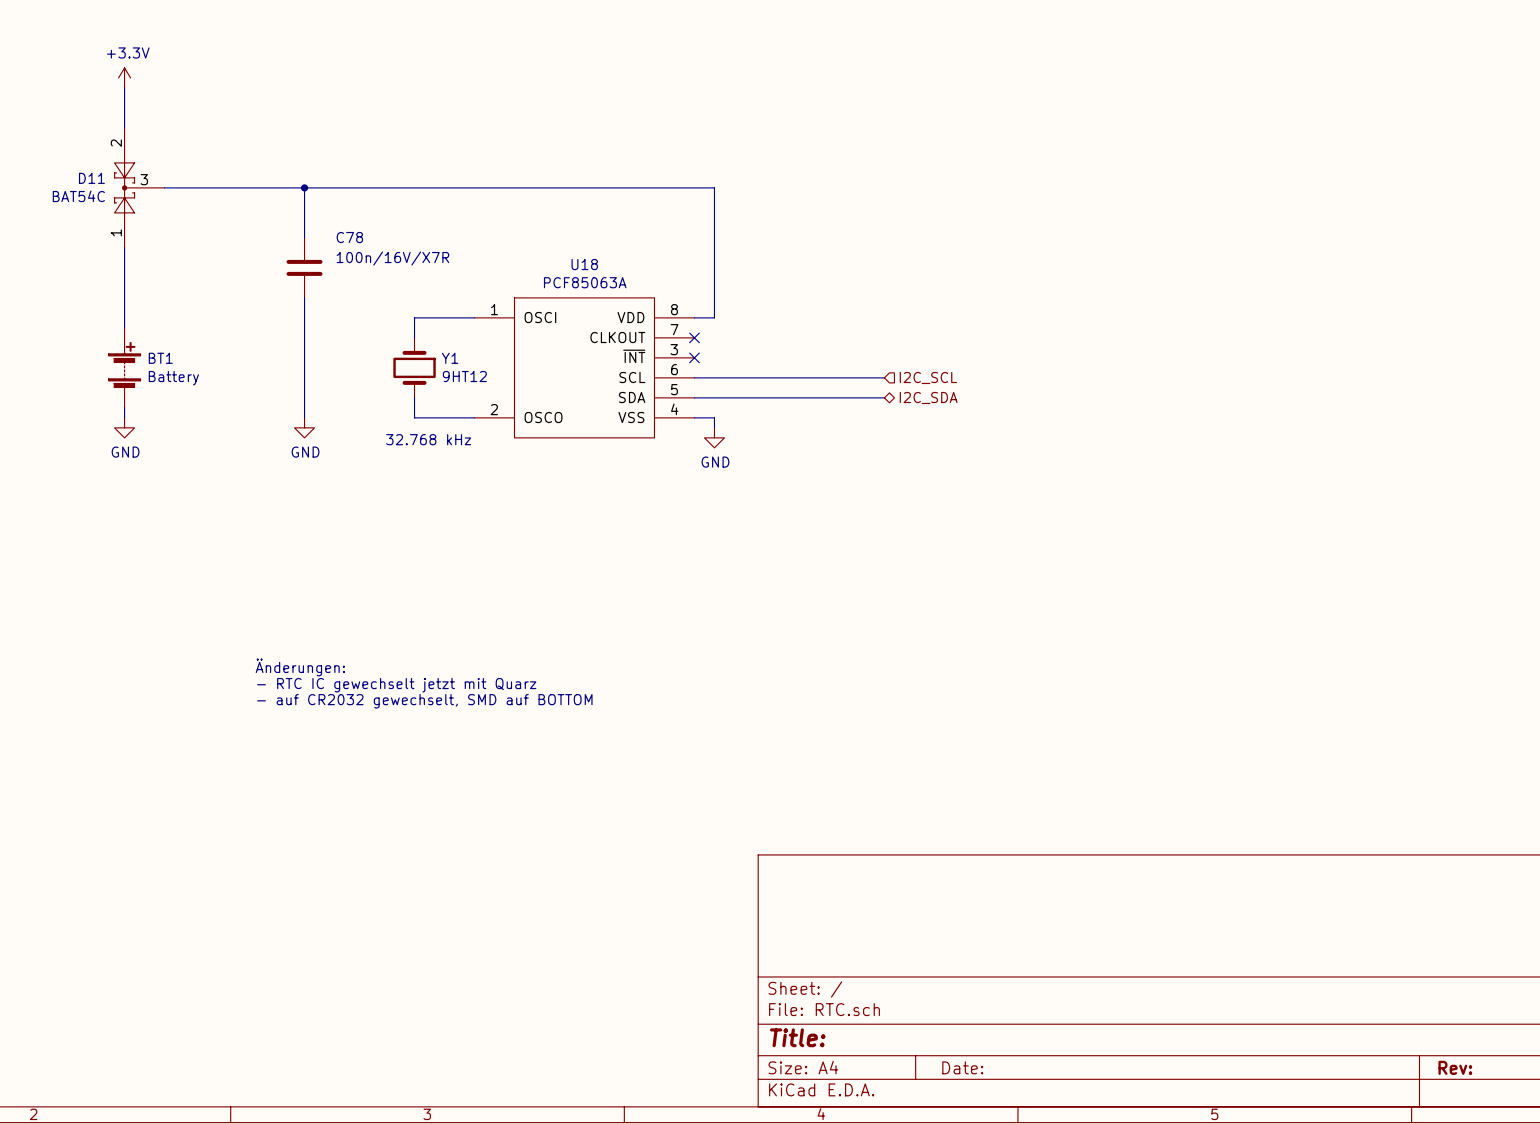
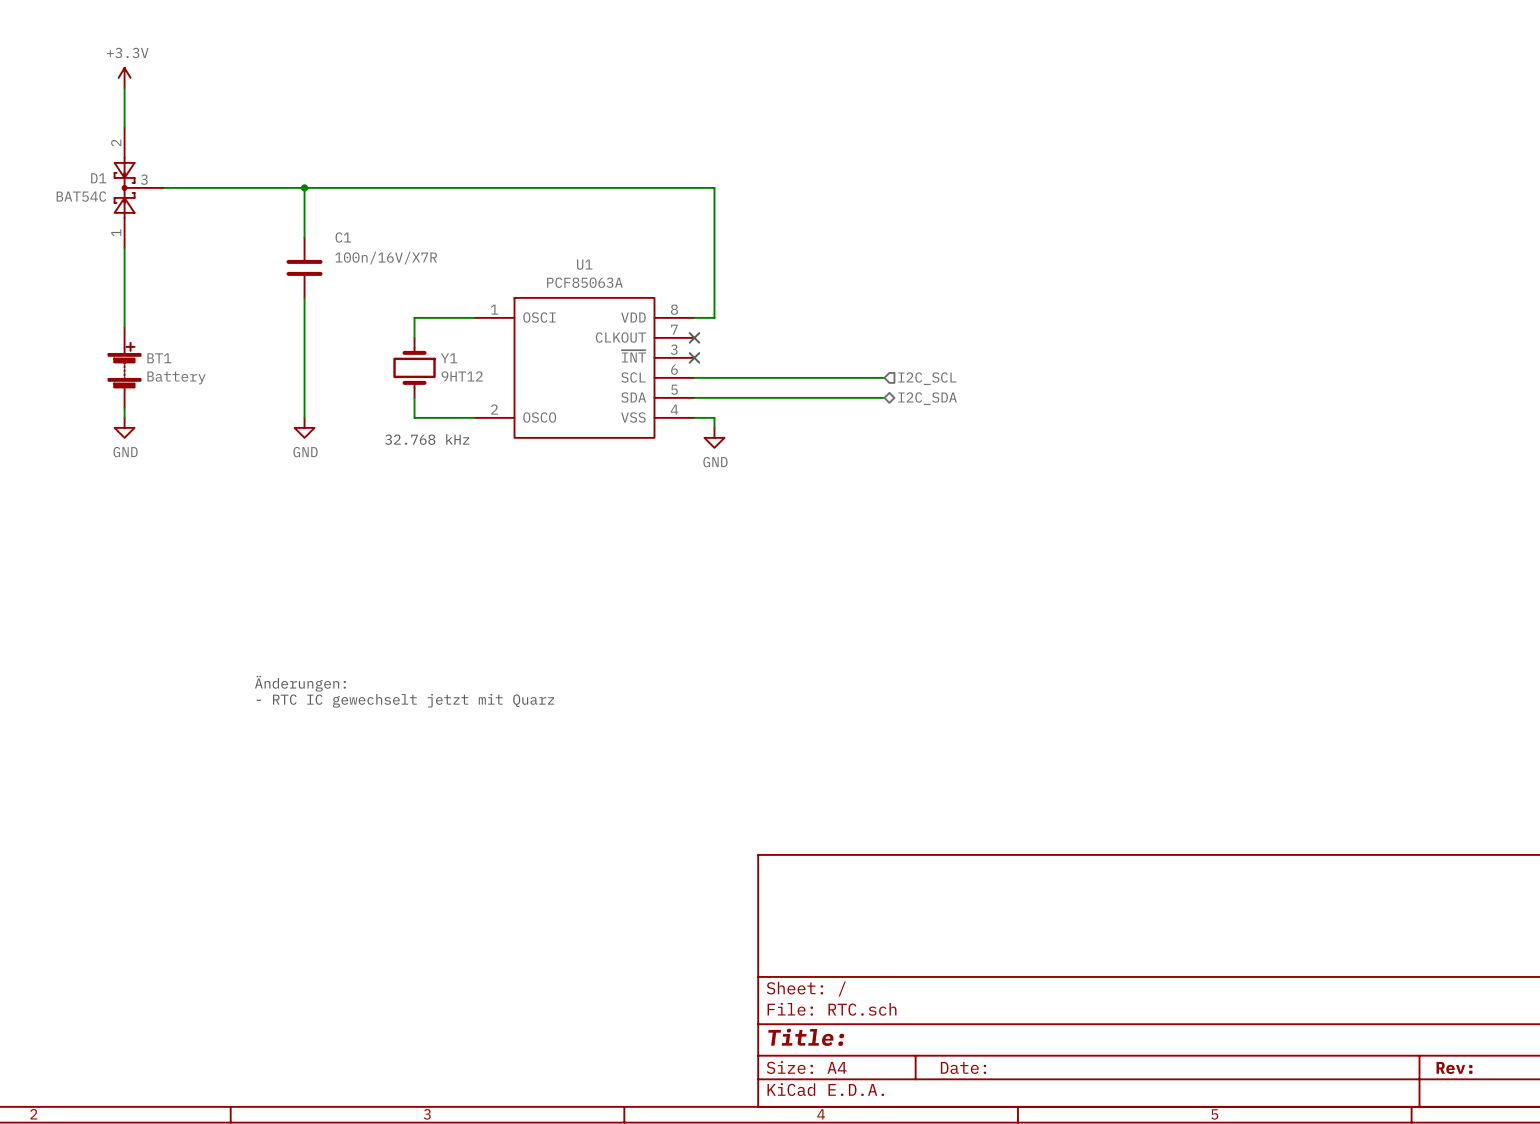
D11 name: D11 (91, 178) -> D1 (98, 178)
C78 name: C78 (349, 237) -> C1 (343, 237)
U18 name: U18 (584, 264) -> U1 (584, 264)
text: Änderungen: (300, 667) -> none
text: - RTC IC gewechselt jetzt mit Quarz (396, 685) -> Änderungen: (300, 683)
text: - auf CR2032 gewechselt, SMD auf BOTTOM (424, 701) -> - RTC IC gewechselt jetzt mit Quarz (405, 700)

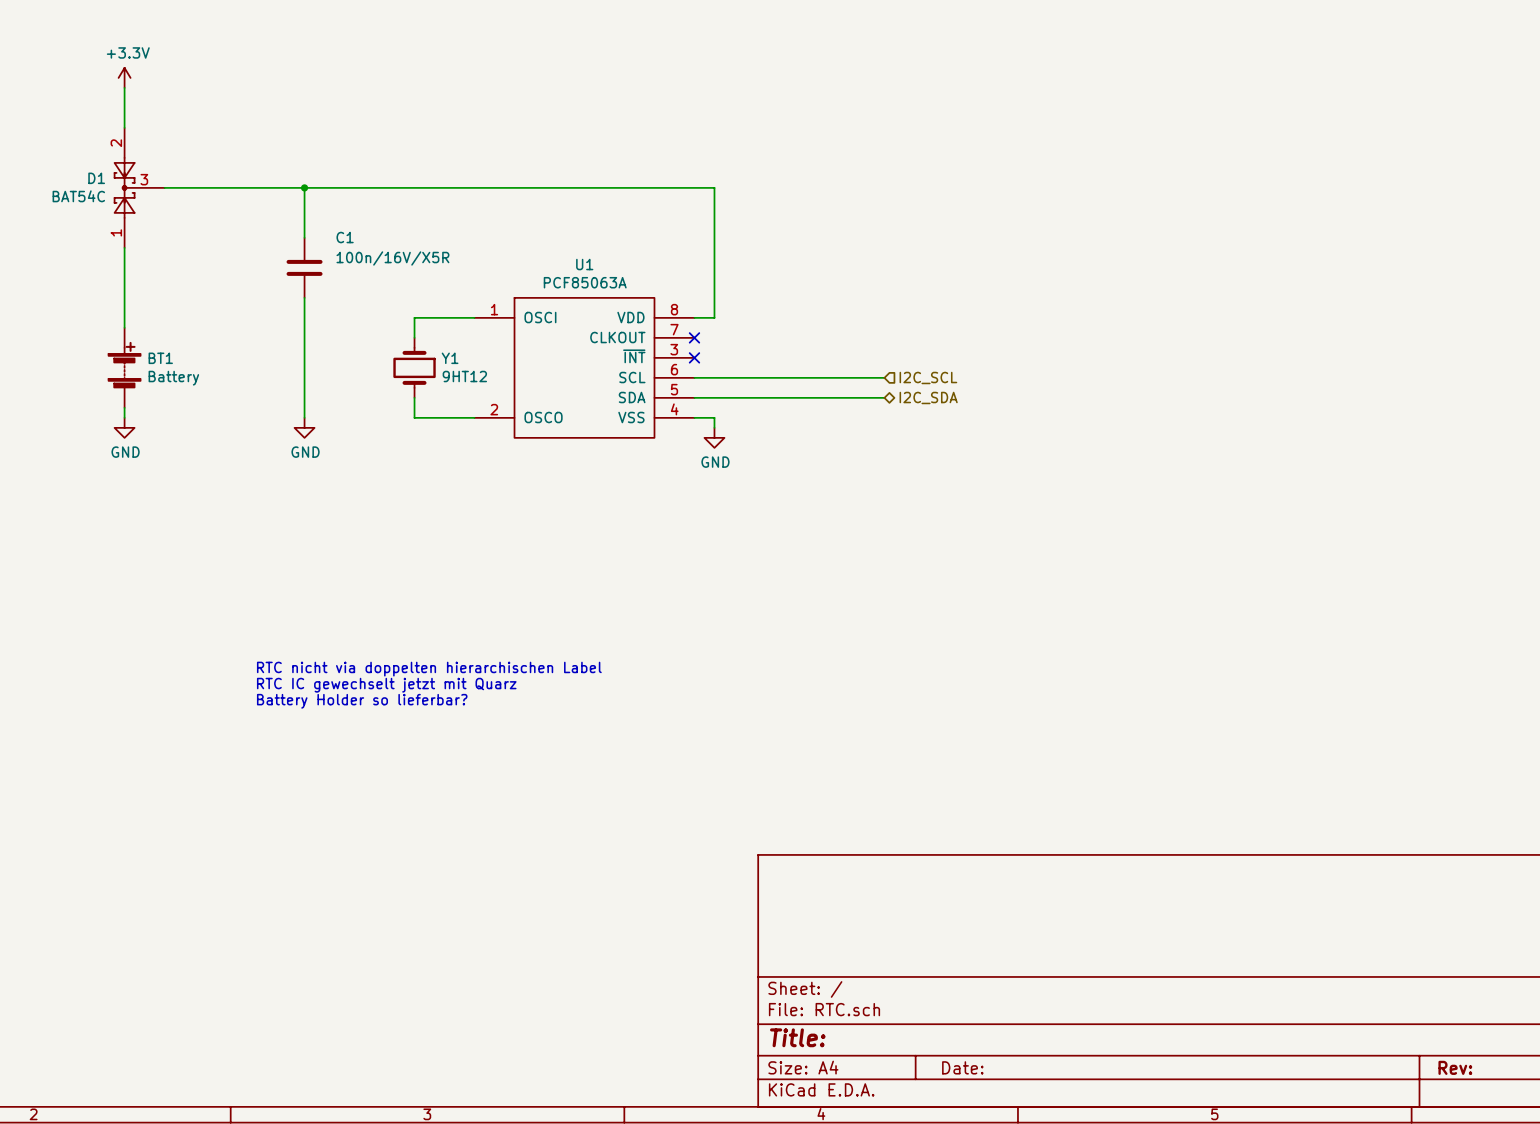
C1 value: 100n/16V/X7R (386, 258) -> 100n/16V/X5R (392, 258)
text: 32.768 kHz (427, 439) -> none
text: none -> RTC nicht via doppelten hierarchischen Label (429, 669)
text: Änderungen: (300, 683) -> RTC IC gewechselt jetzt mit Quarz (386, 685)
text: - RTC IC gewechselt jetzt mit Quarz (405, 700) -> Battery Holder so lieferbar? (362, 701)

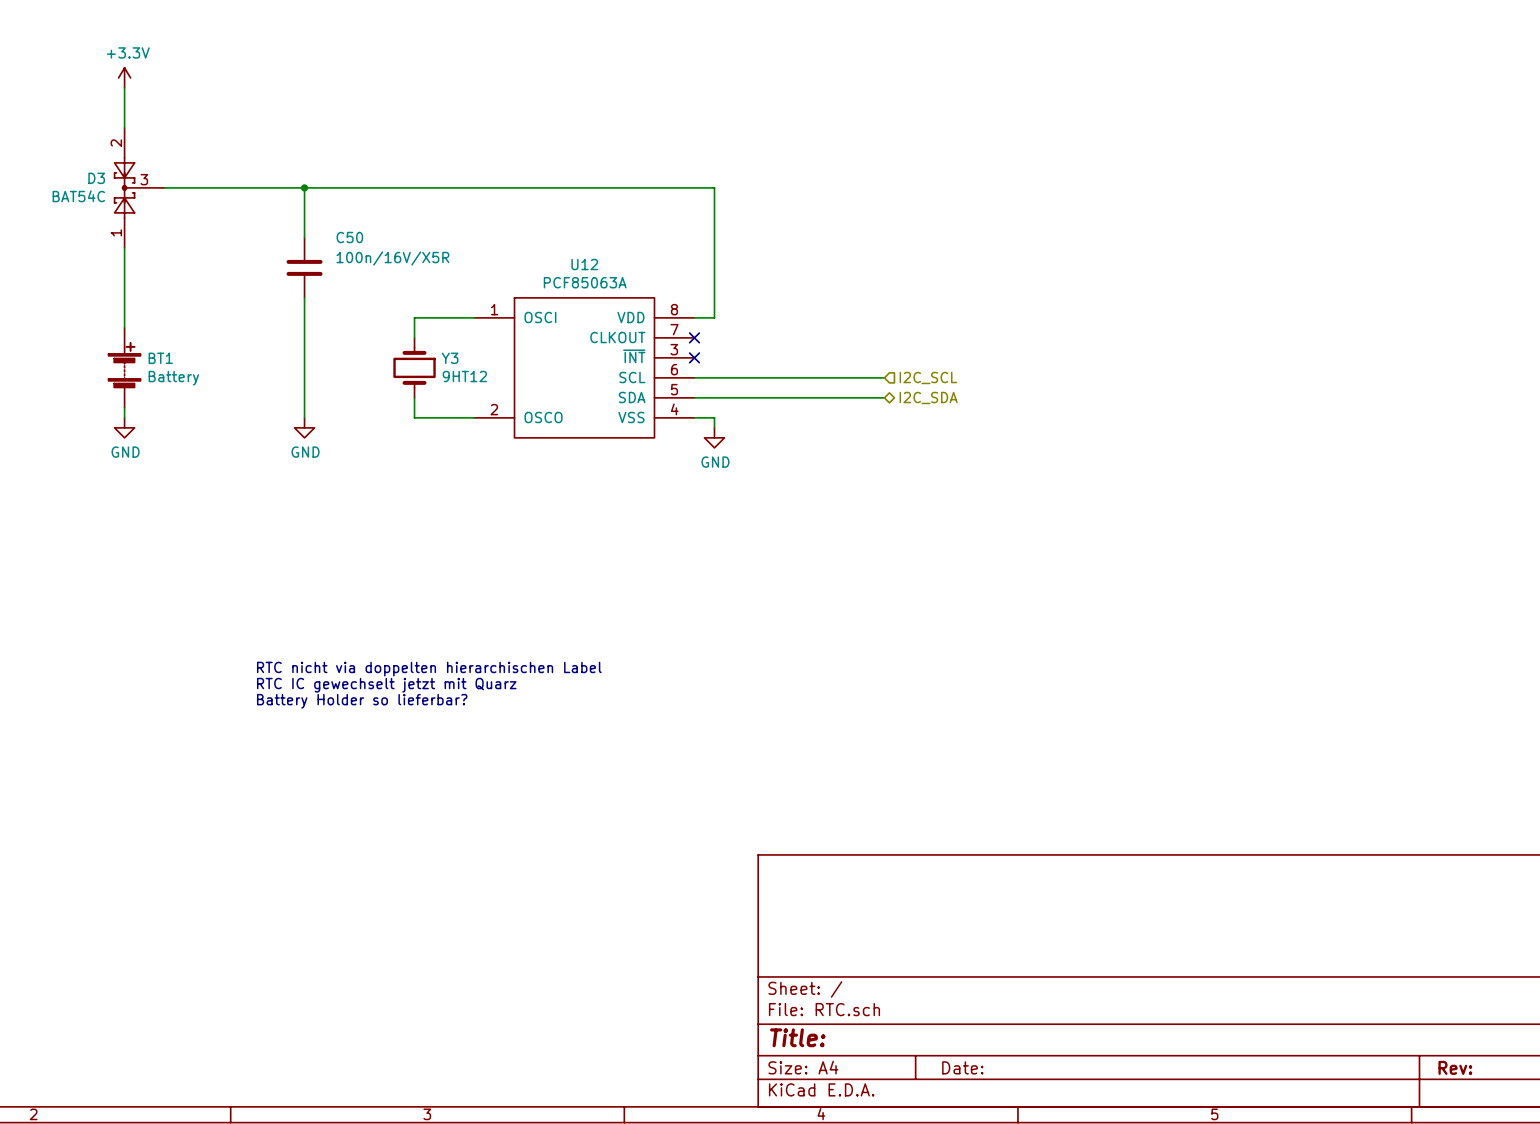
D1 name: D1 (96, 178) -> D3 (96, 178)
C1 name: C1 (345, 237) -> C50 (349, 237)
U1 name: U1 (584, 264) -> U12 (584, 264)
Y1 name: Y1 (450, 358) -> Y3 (450, 358)

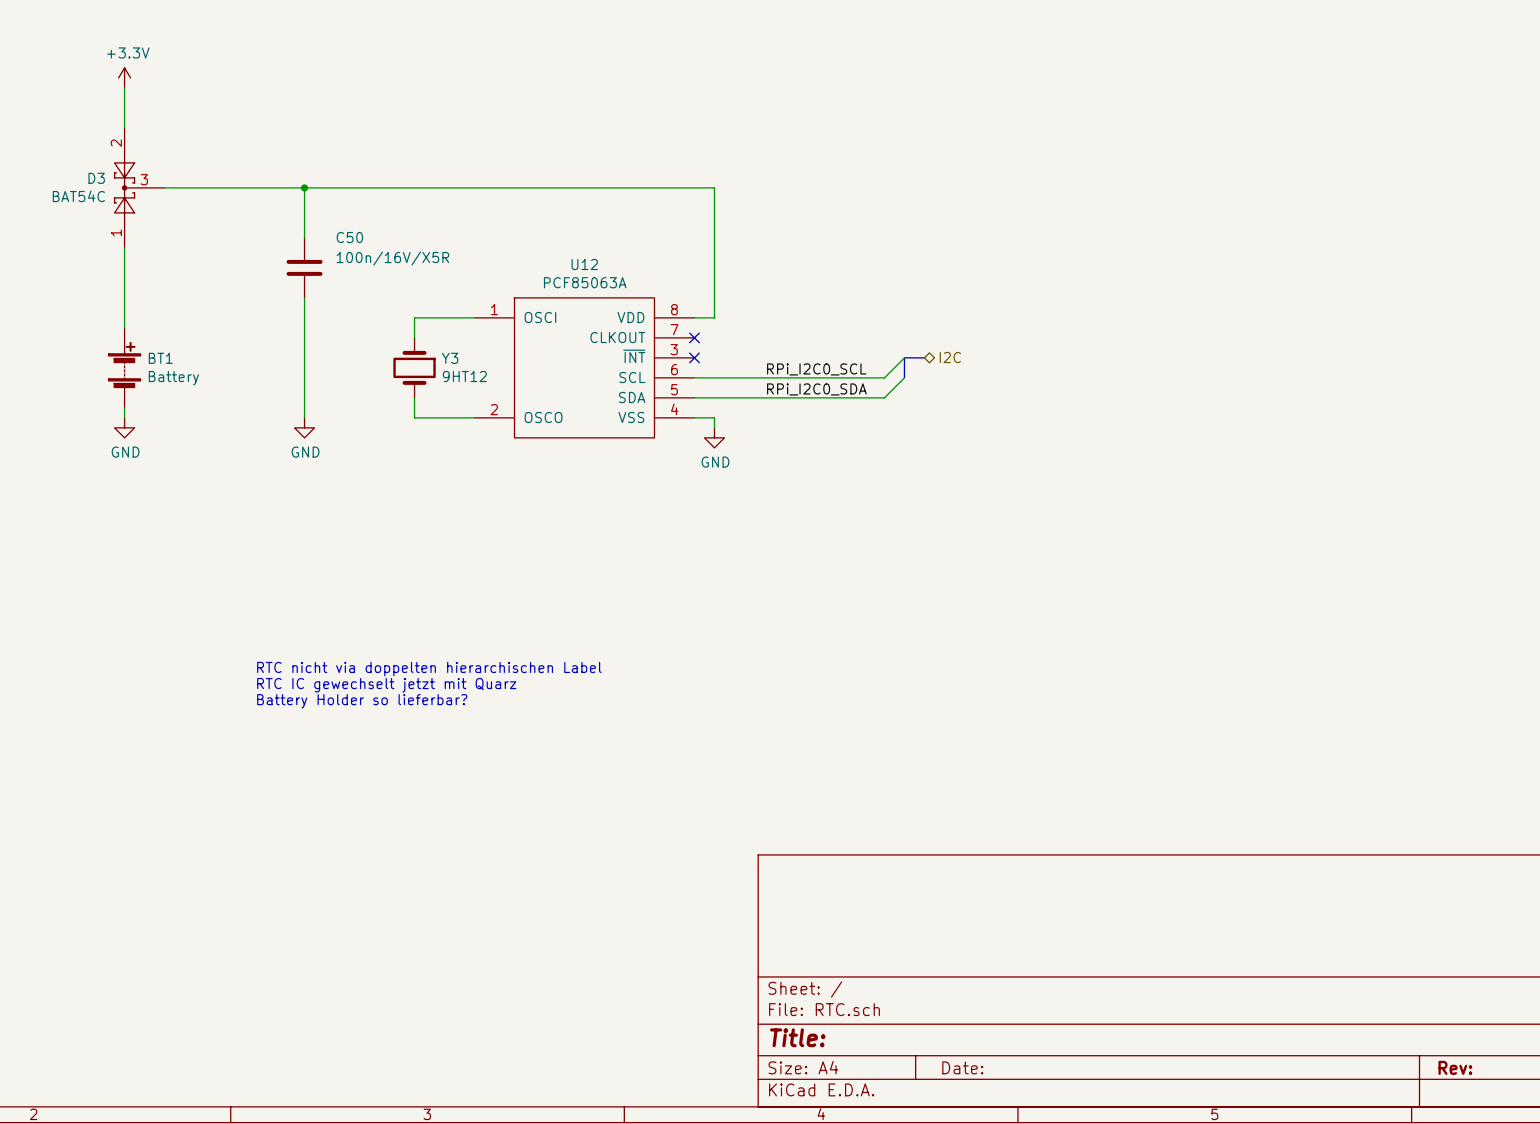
wire: none -> (904, 357) (884, 377)
bus: none -> (924, 357) (904, 357) (904, 377)
hierarchical label: none -> I2C (950, 357)
label: none -> RPi_I2C0_SCL (816, 369)
wire: none -> (904, 377) (884, 397)
hierarchical label: I2C_SCL (928, 377) -> none
label: none -> RPi_I2C0_SDA (816, 389)
hierarchical label: I2C_SDA (928, 397) -> none

